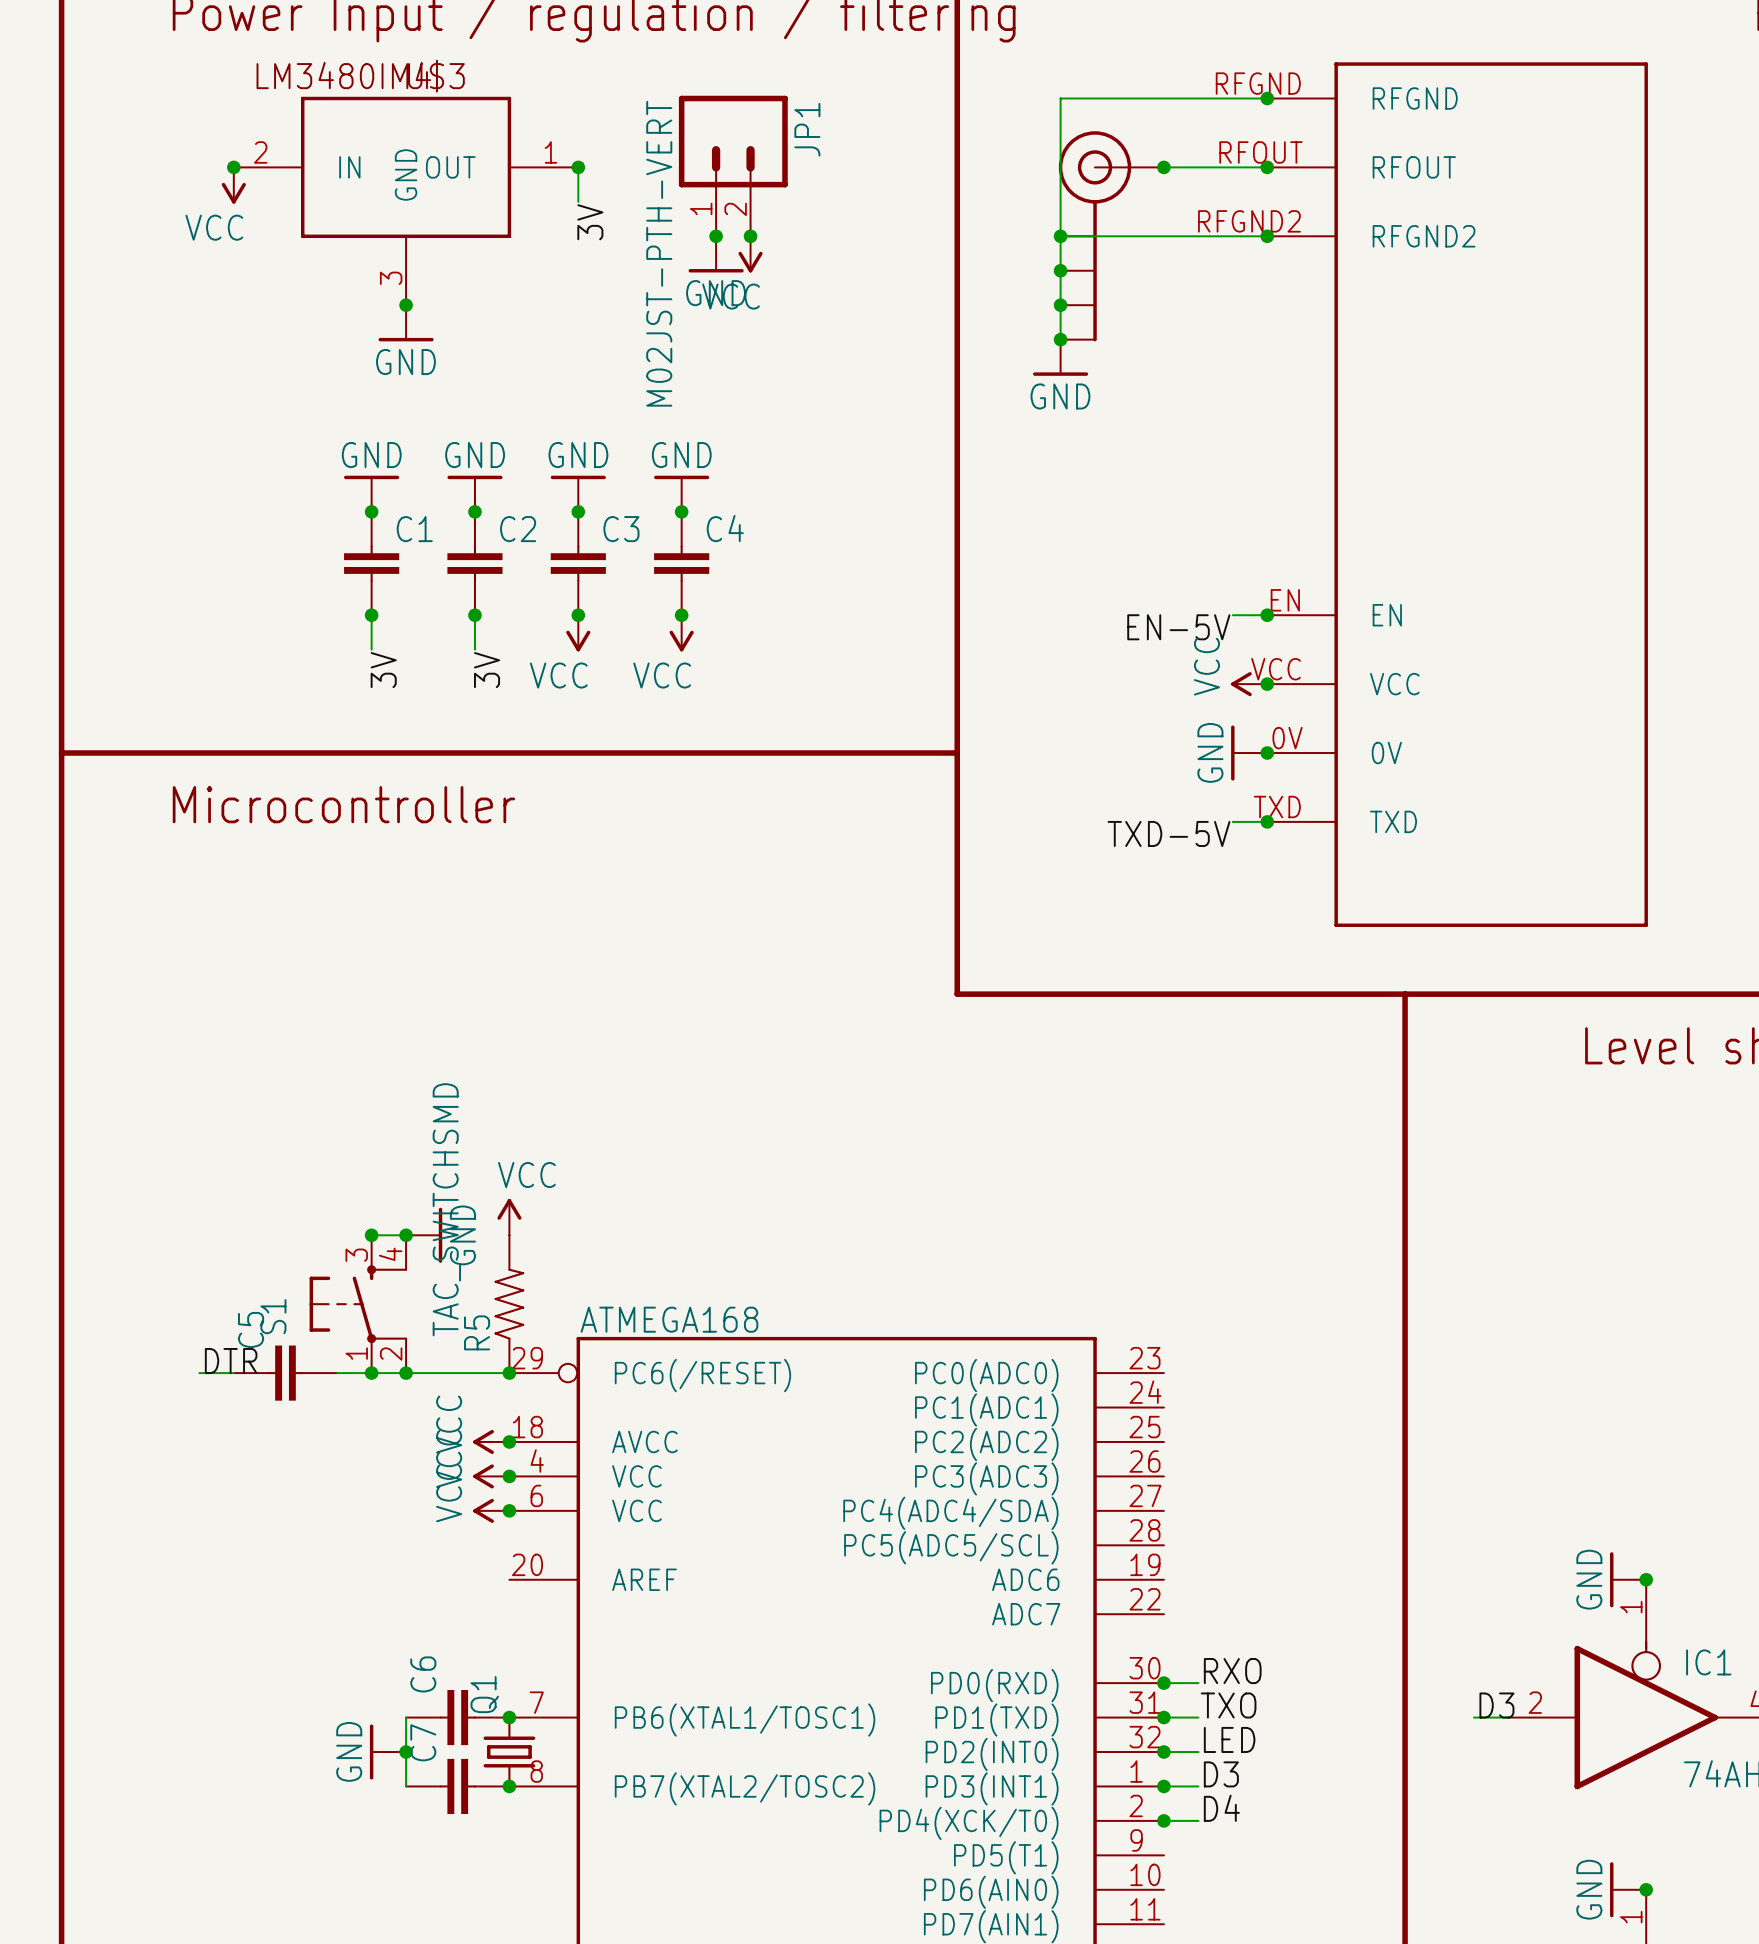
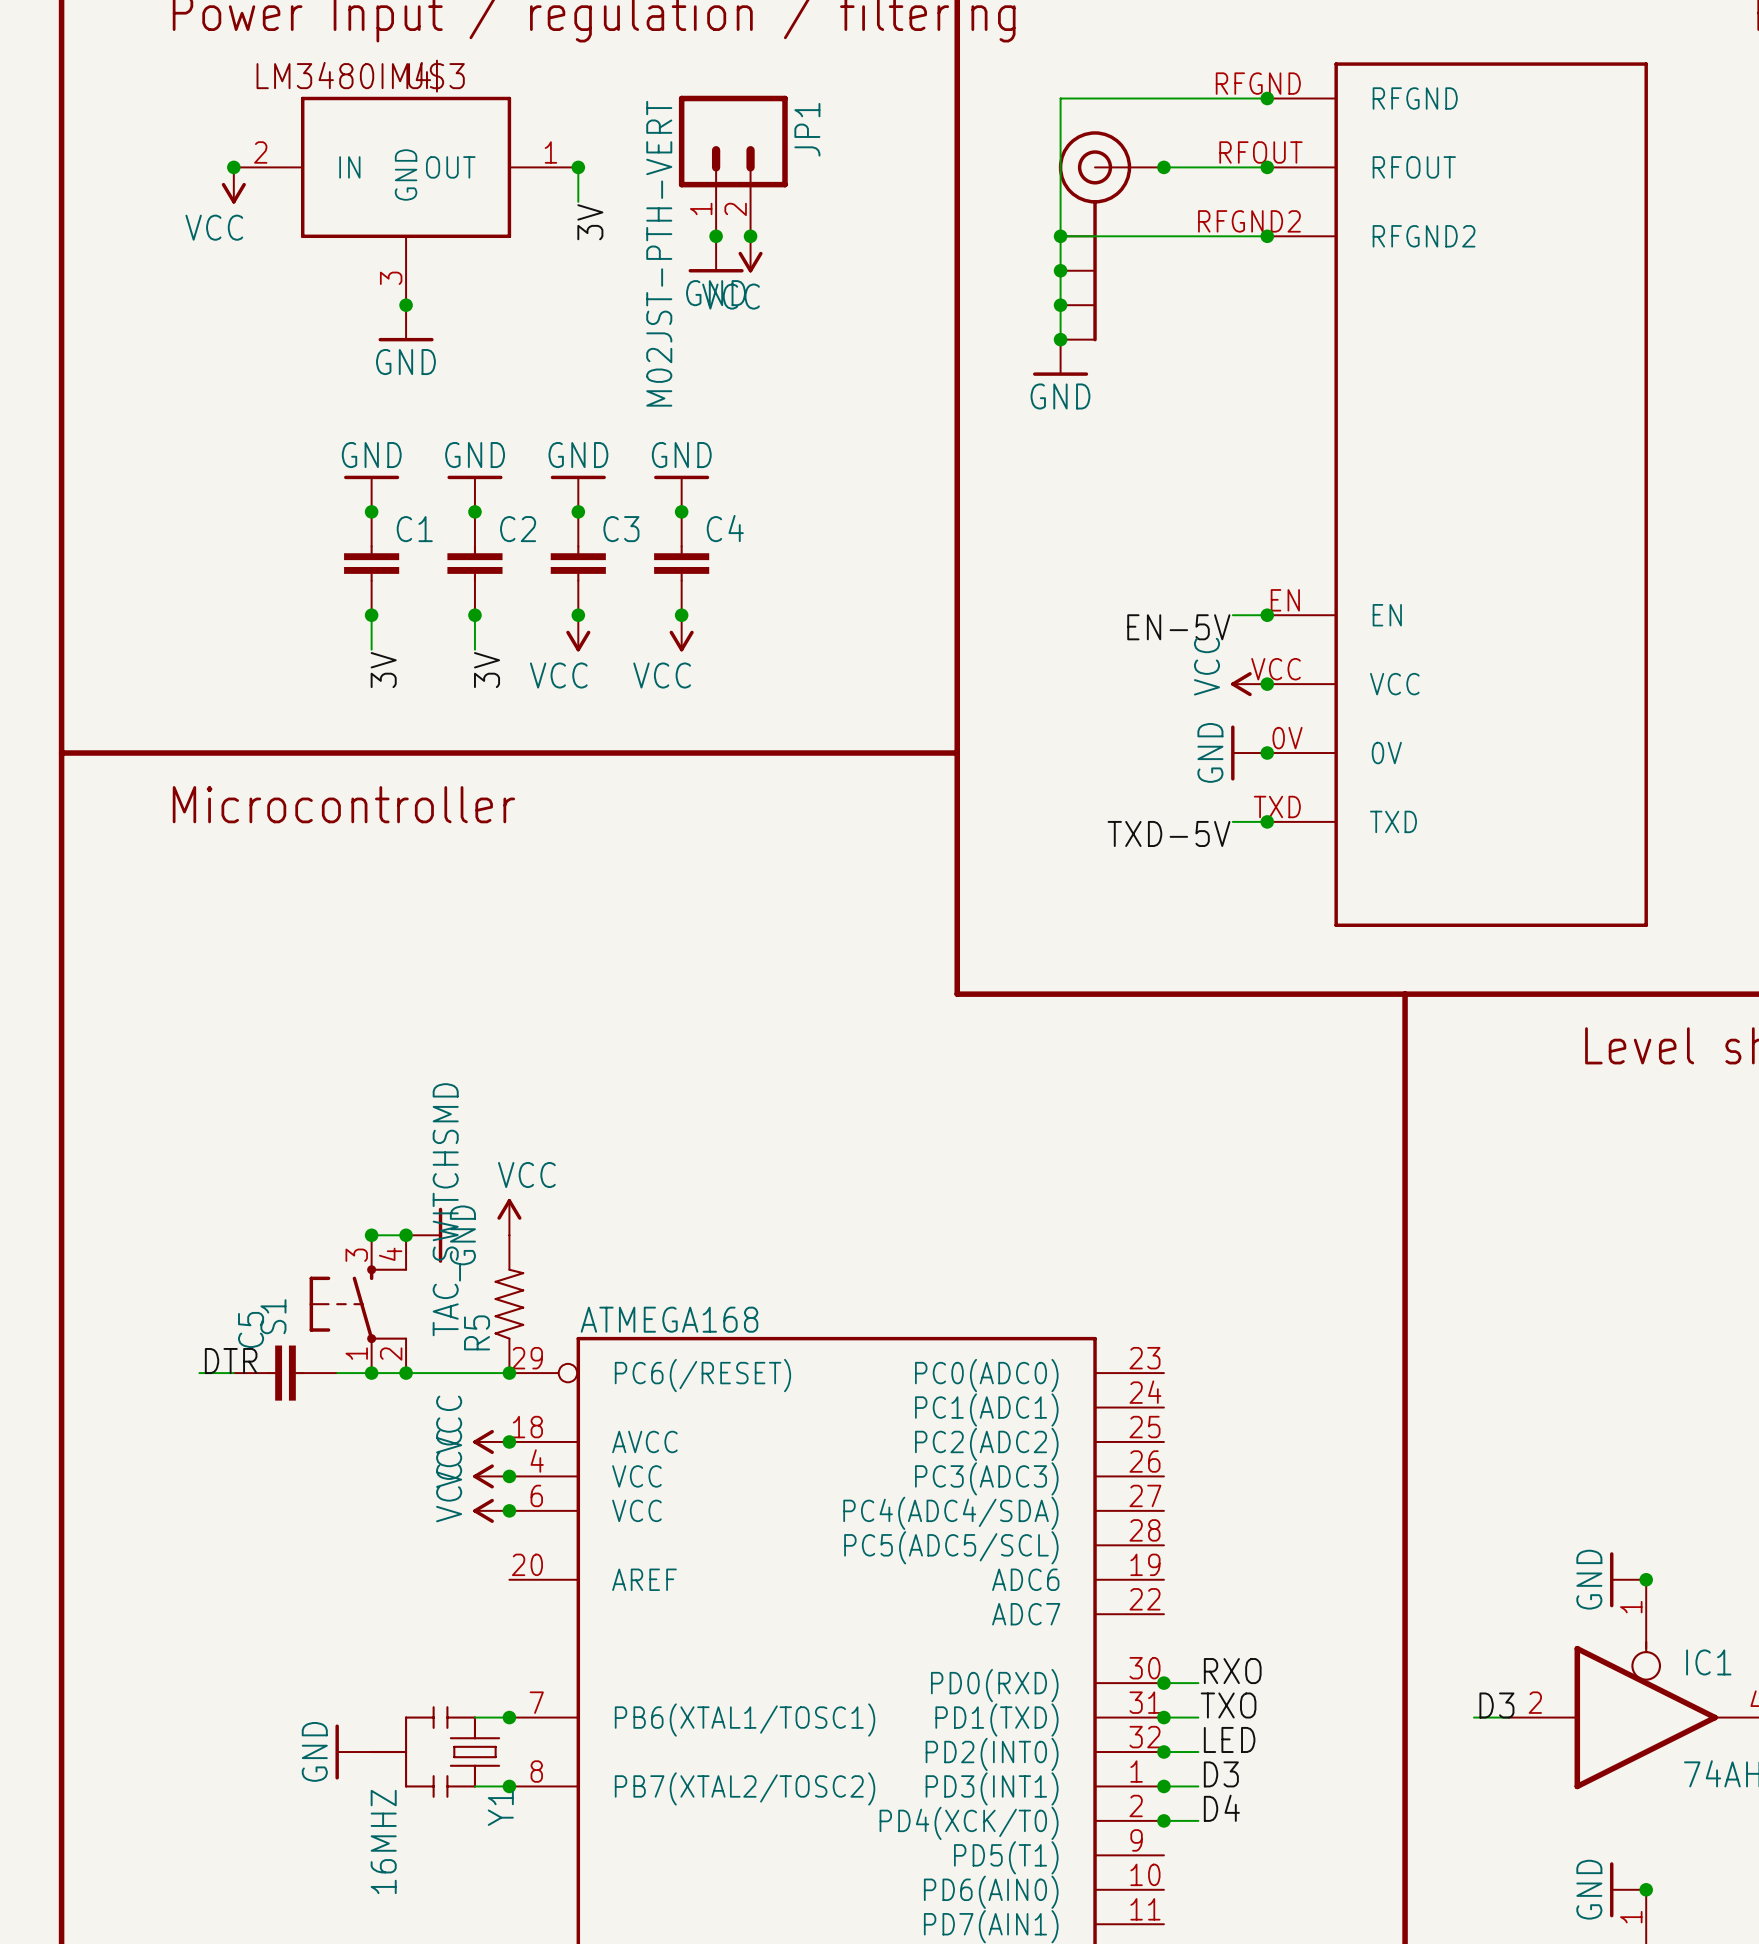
C6: (457, 1717) -> none
power symbol position: GND (387, 1752) -> GND (353, 1752)
junction: (406, 1752) -> none
Y1: none -> 16MHZ (435, 1752)
Q1: (509, 1752) -> none
C7: (457, 1786) -> none

